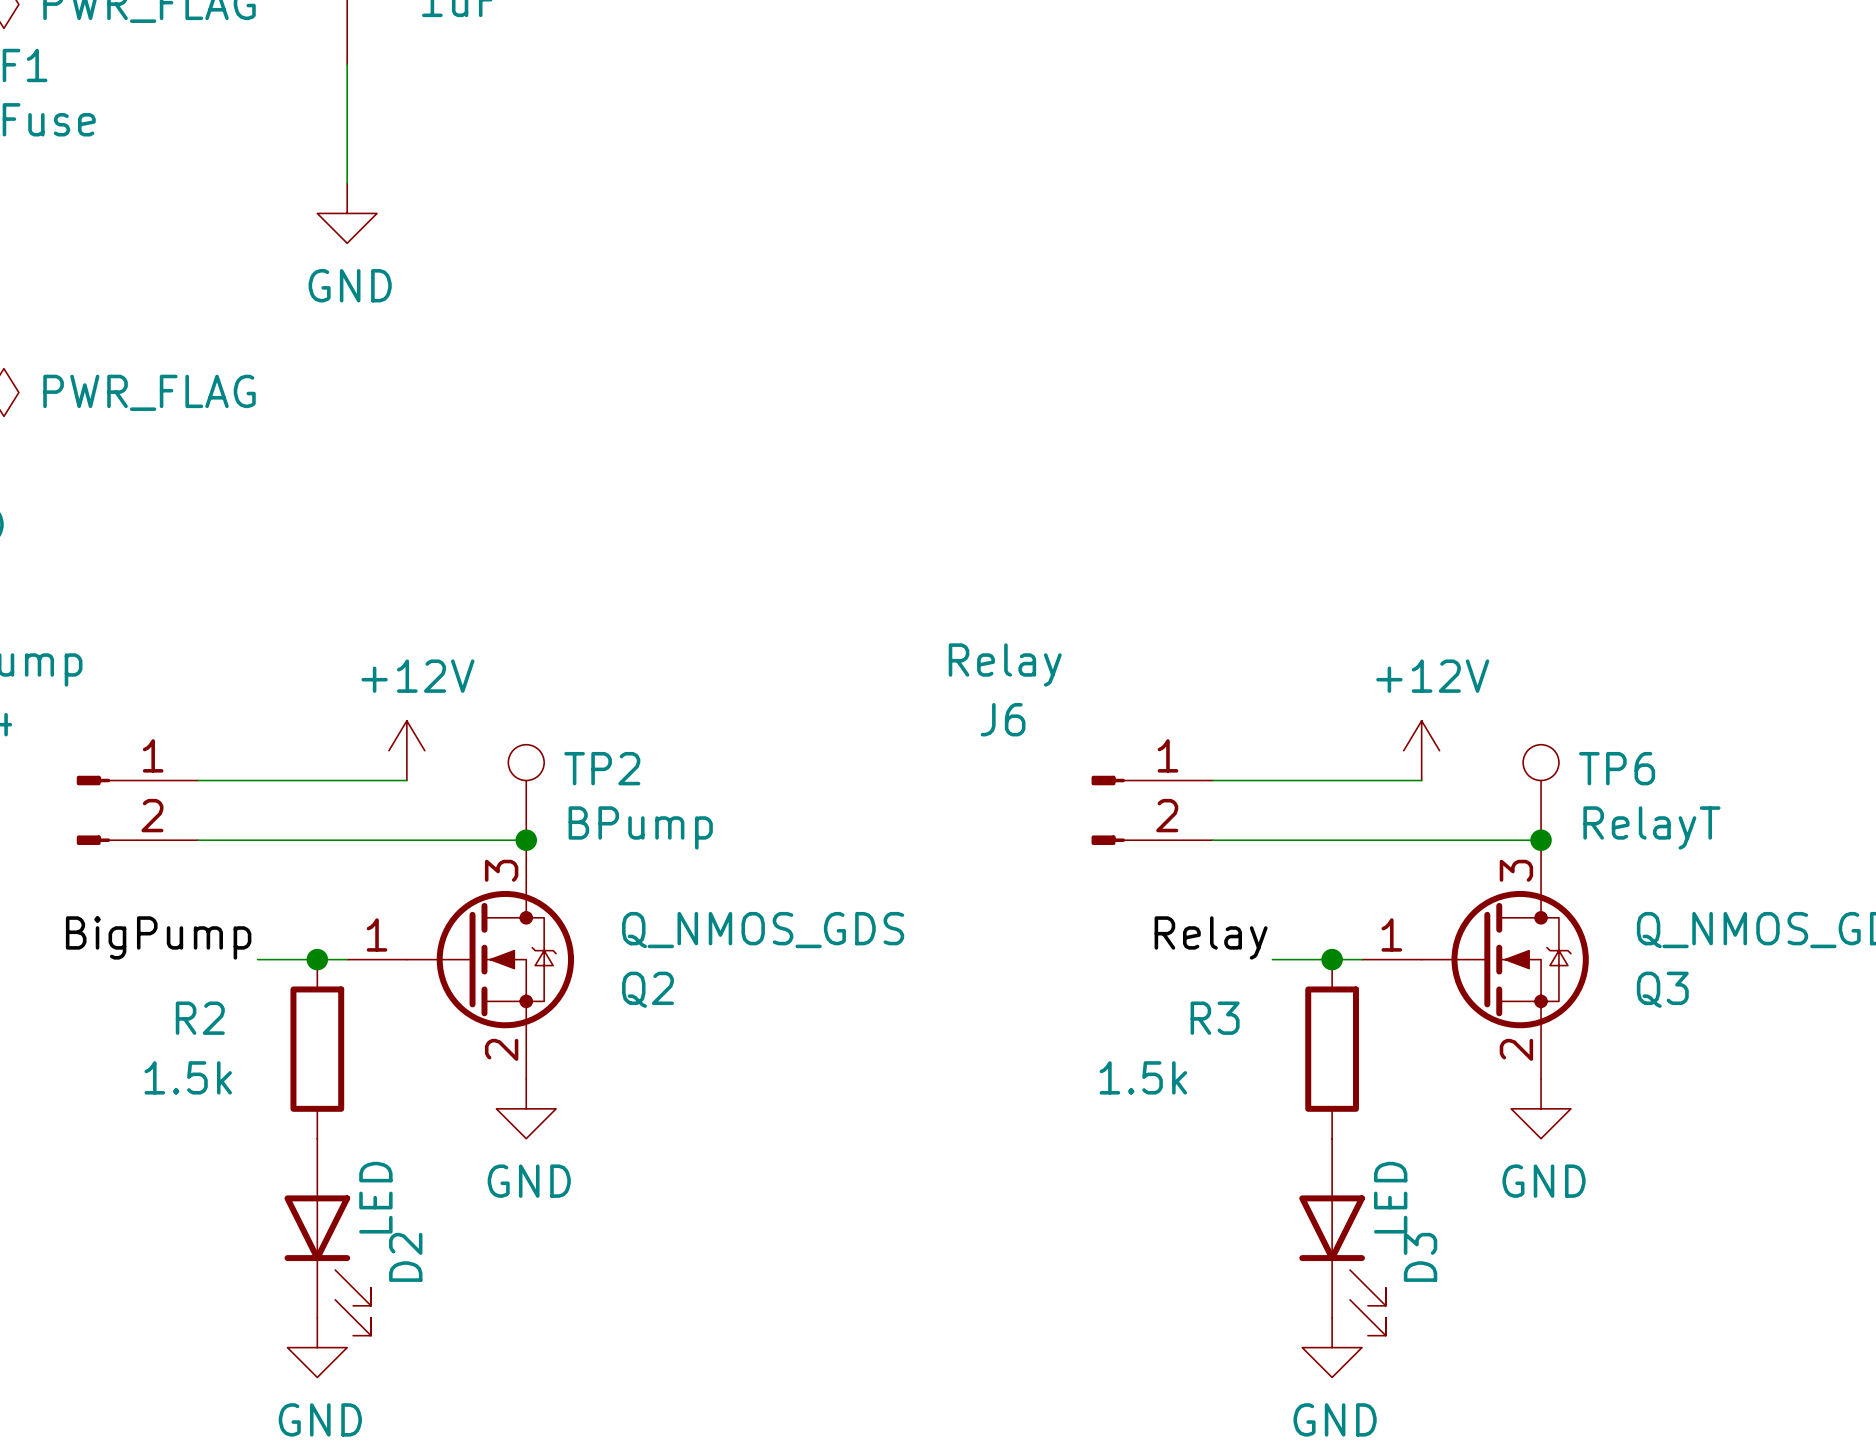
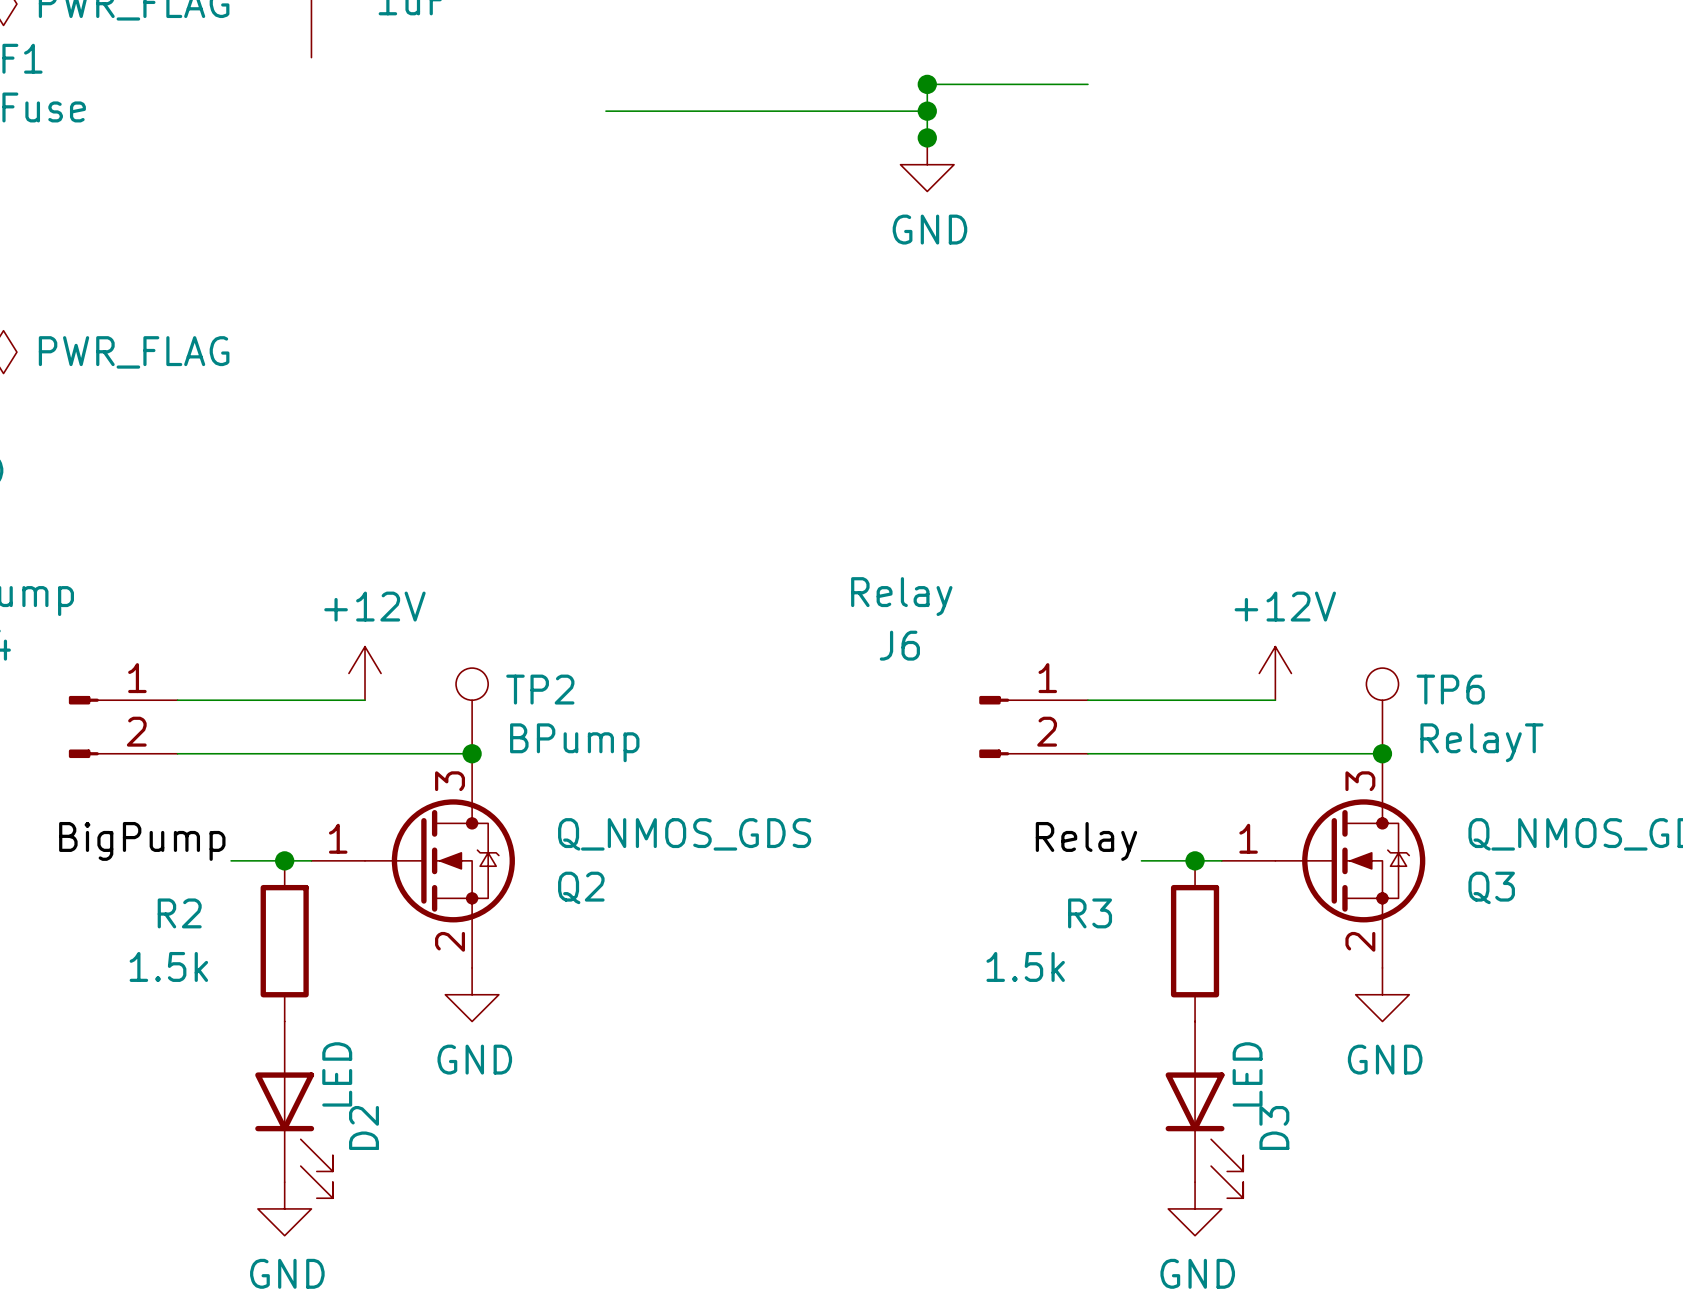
wire: (347, 64) (347, 183) -> none
junction: none -> (927, 84)
wire: none -> (1087, 84) (927, 84) (927, 137)
wire: none -> (605, 111) (927, 111)
junction: none -> (927, 111)
junction: none -> (927, 137)
power symbol: none -> GND (927, 164)
power symbol: GND (347, 213) -> none

